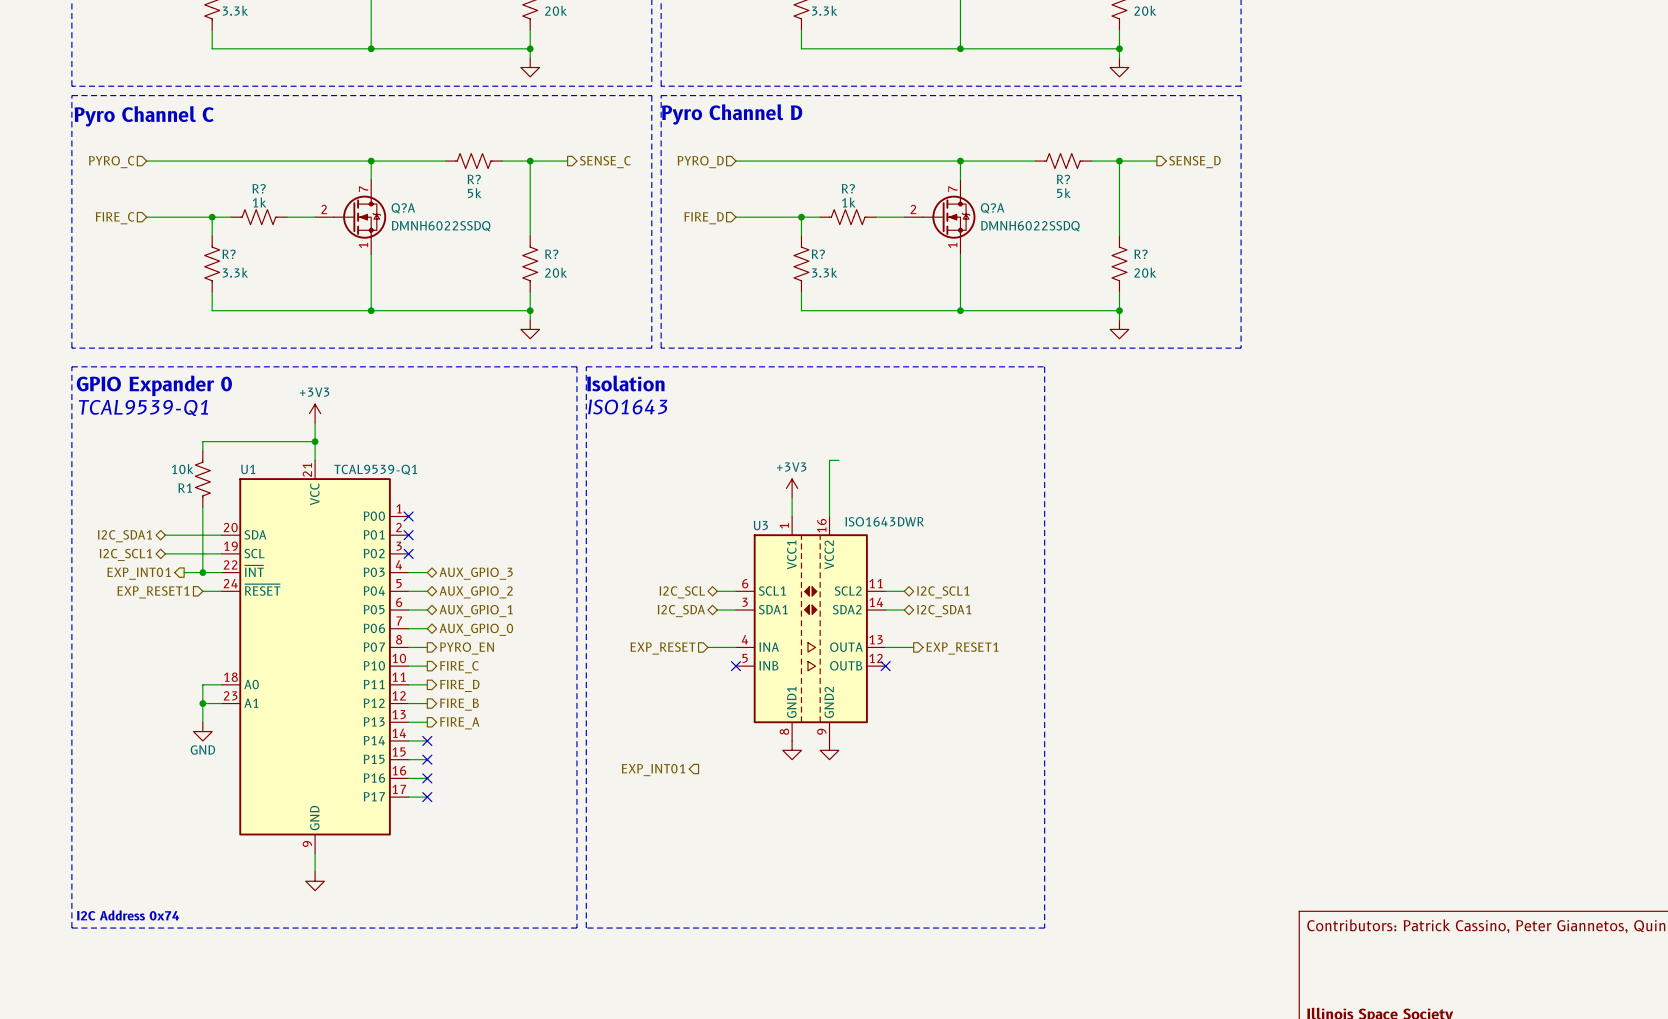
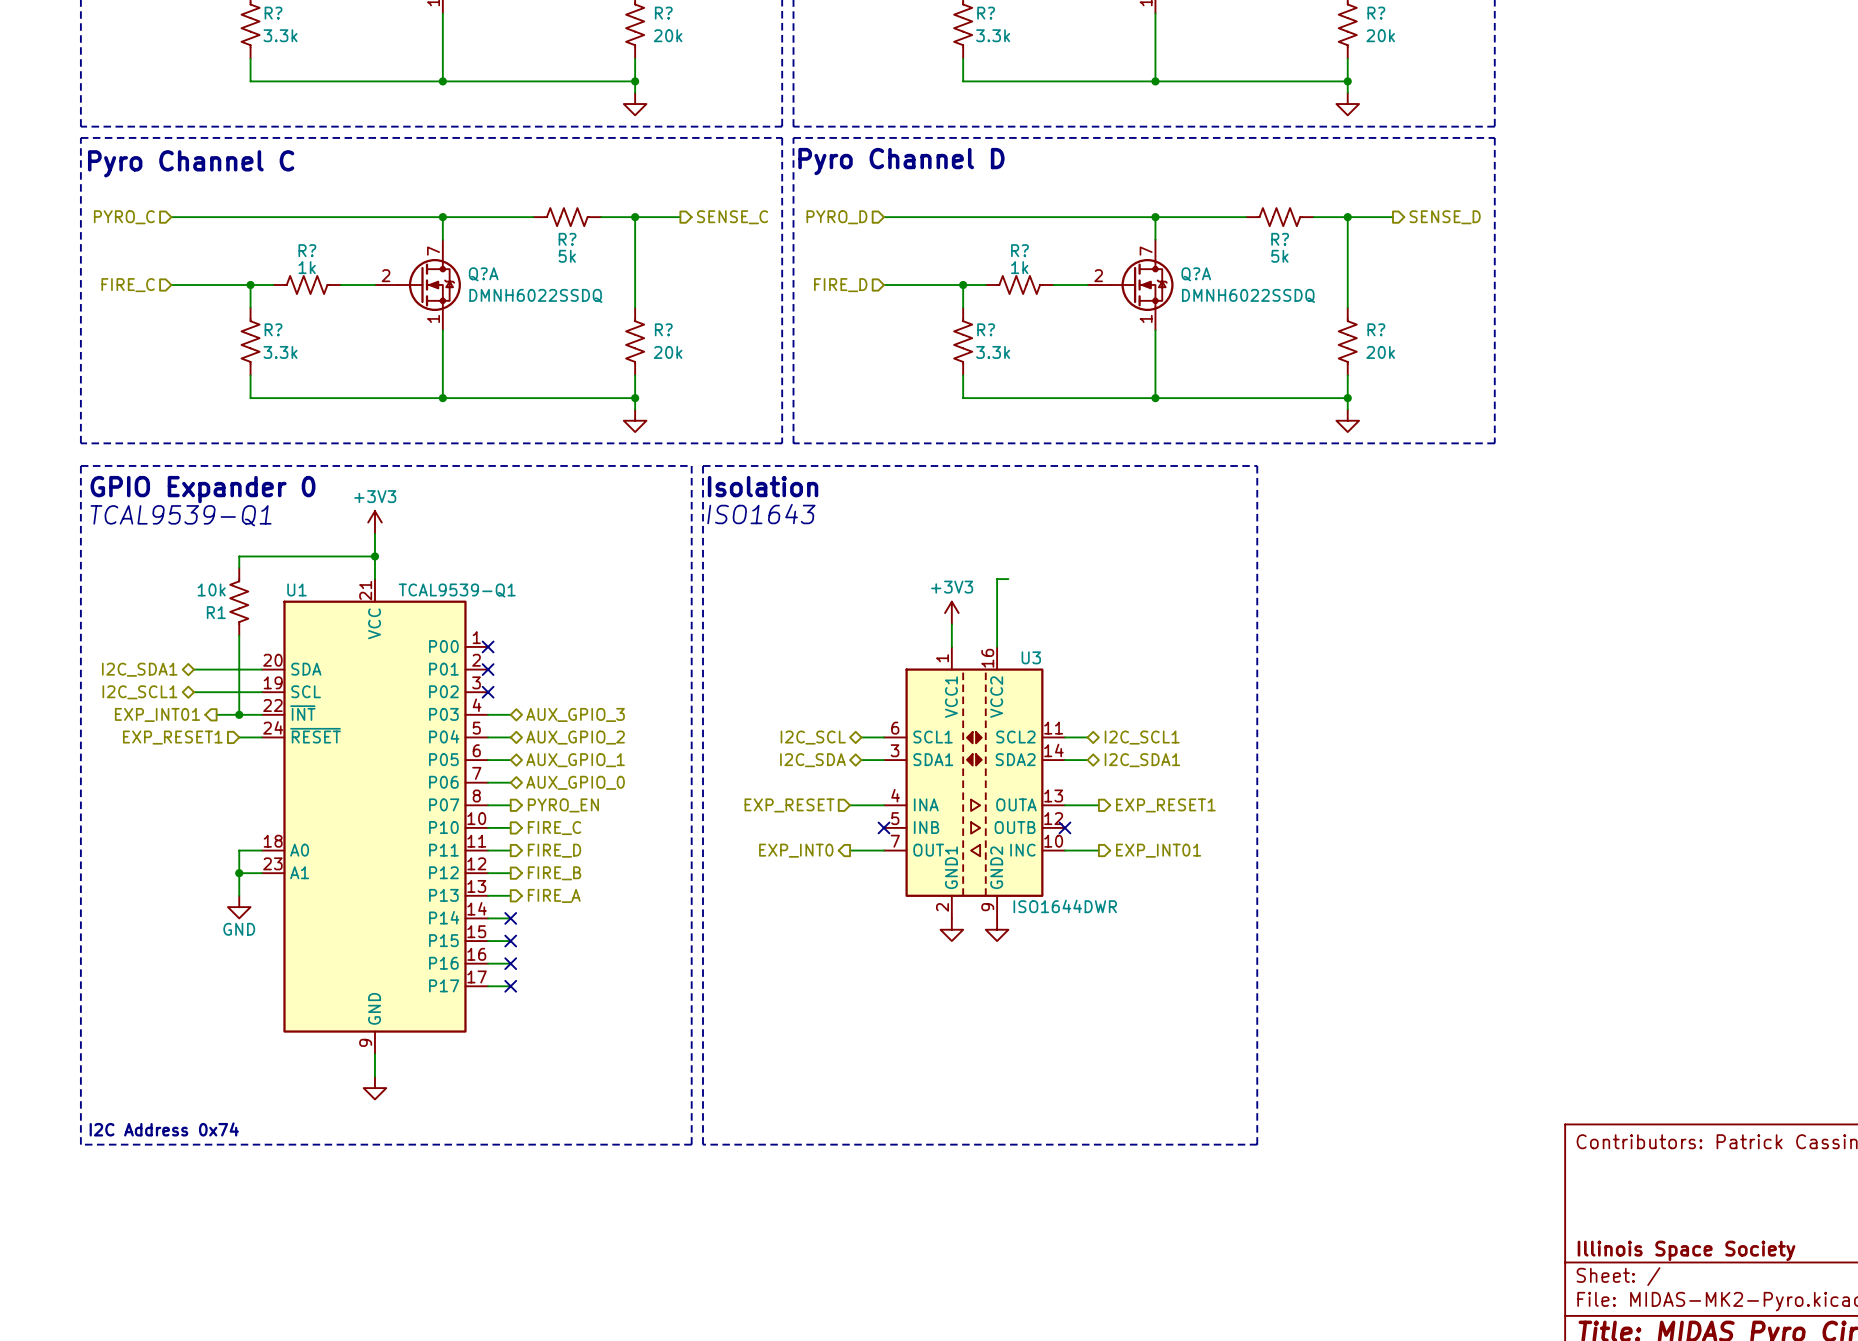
U3 symbol: [735, 516, 886, 741] -> [883, 646, 1065, 919]
U3 value: ISO1643DWR (884, 521) -> ISO1644DWR (1065, 906)
U3 name position: U3 (760, 525) -> U3 (1031, 657)
wire: none -> (850, 850) (883, 850)
wire: none -> (1064, 850) (1098, 850)
hierarchical label: none -> EXP_INT0 (796, 850)
hierarchical label: none -> EXP_INT01 (1158, 850)
hierarchical label: EXP_INT01 (653, 770) -> none

